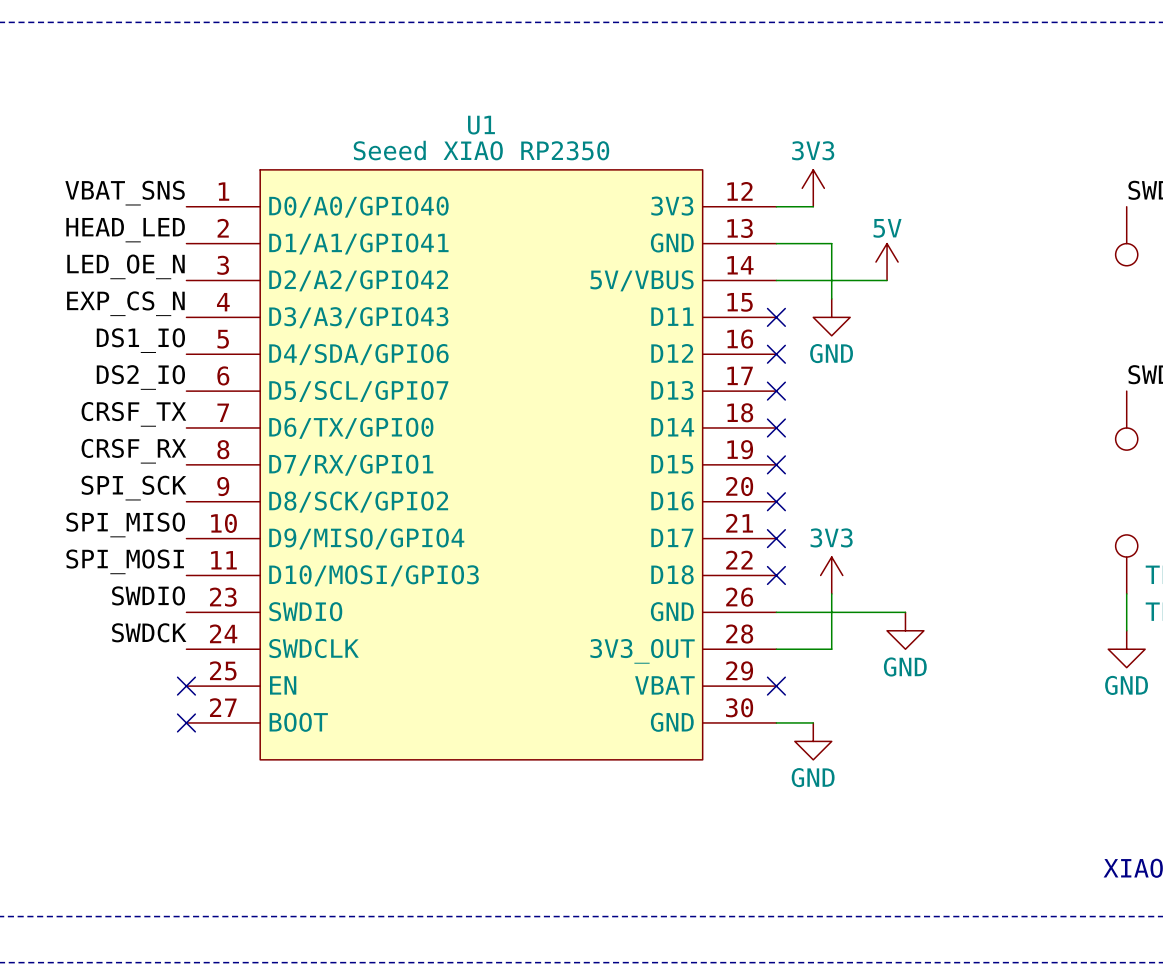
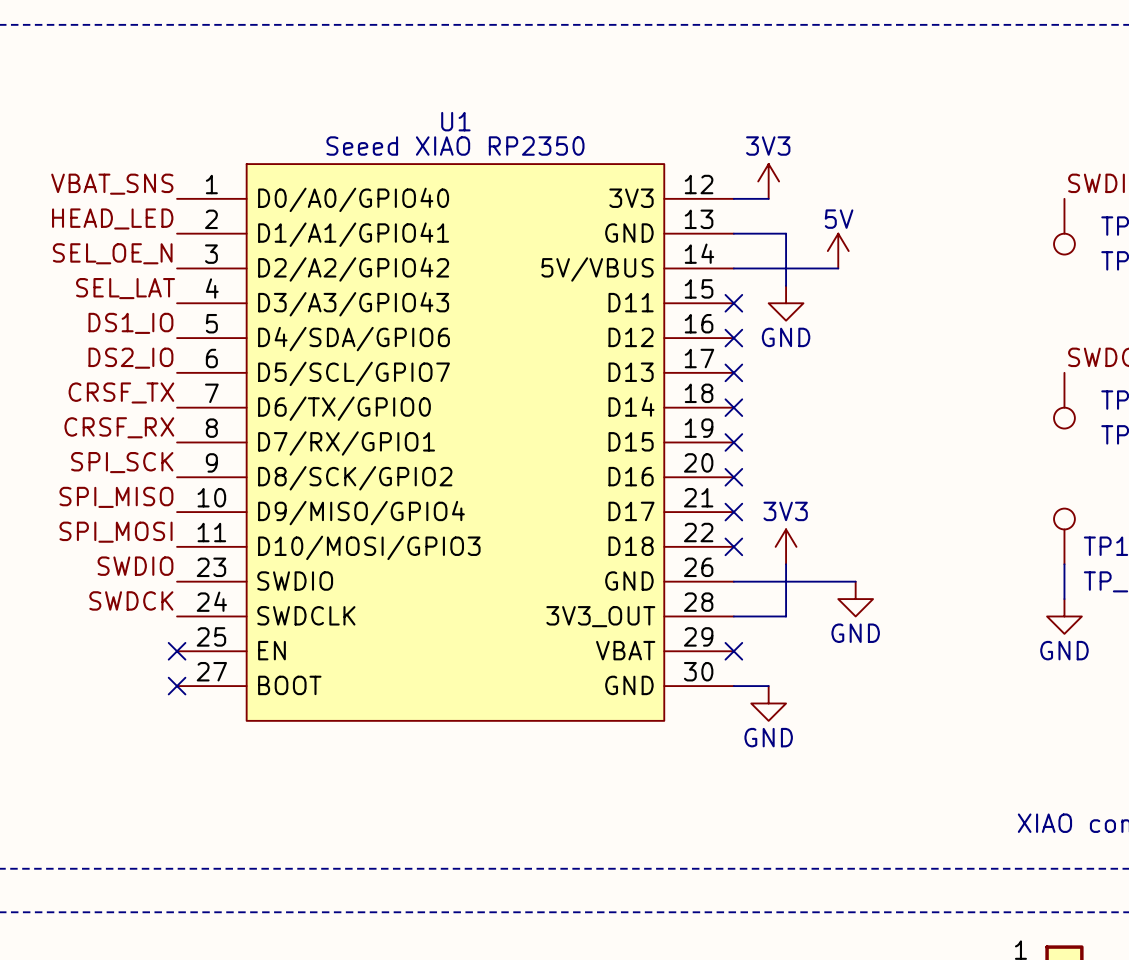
label: LED_OE_N (126, 266) -> SEL_OE_N (112, 253)
label: EXP_CS_N (125, 303) -> SEL_LAT (125, 288)

